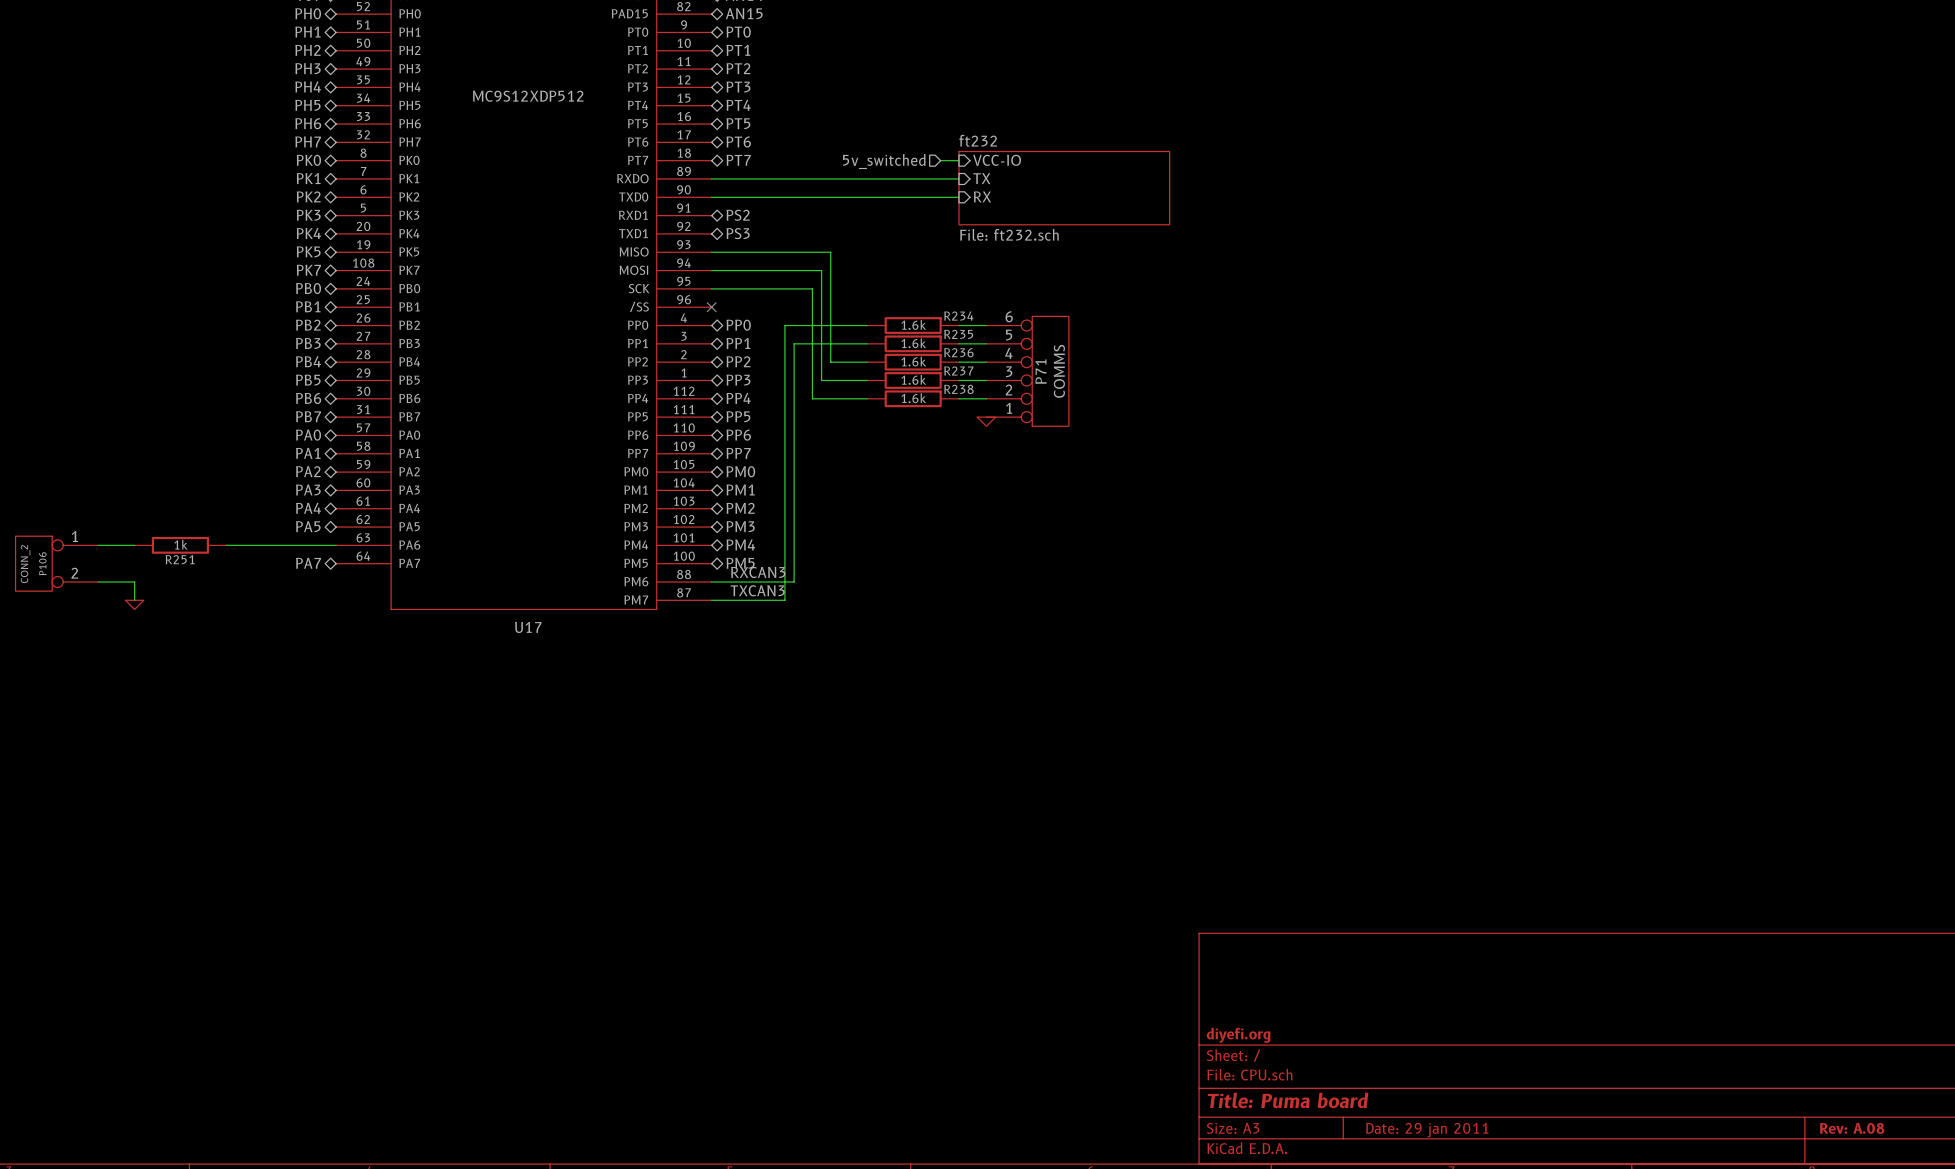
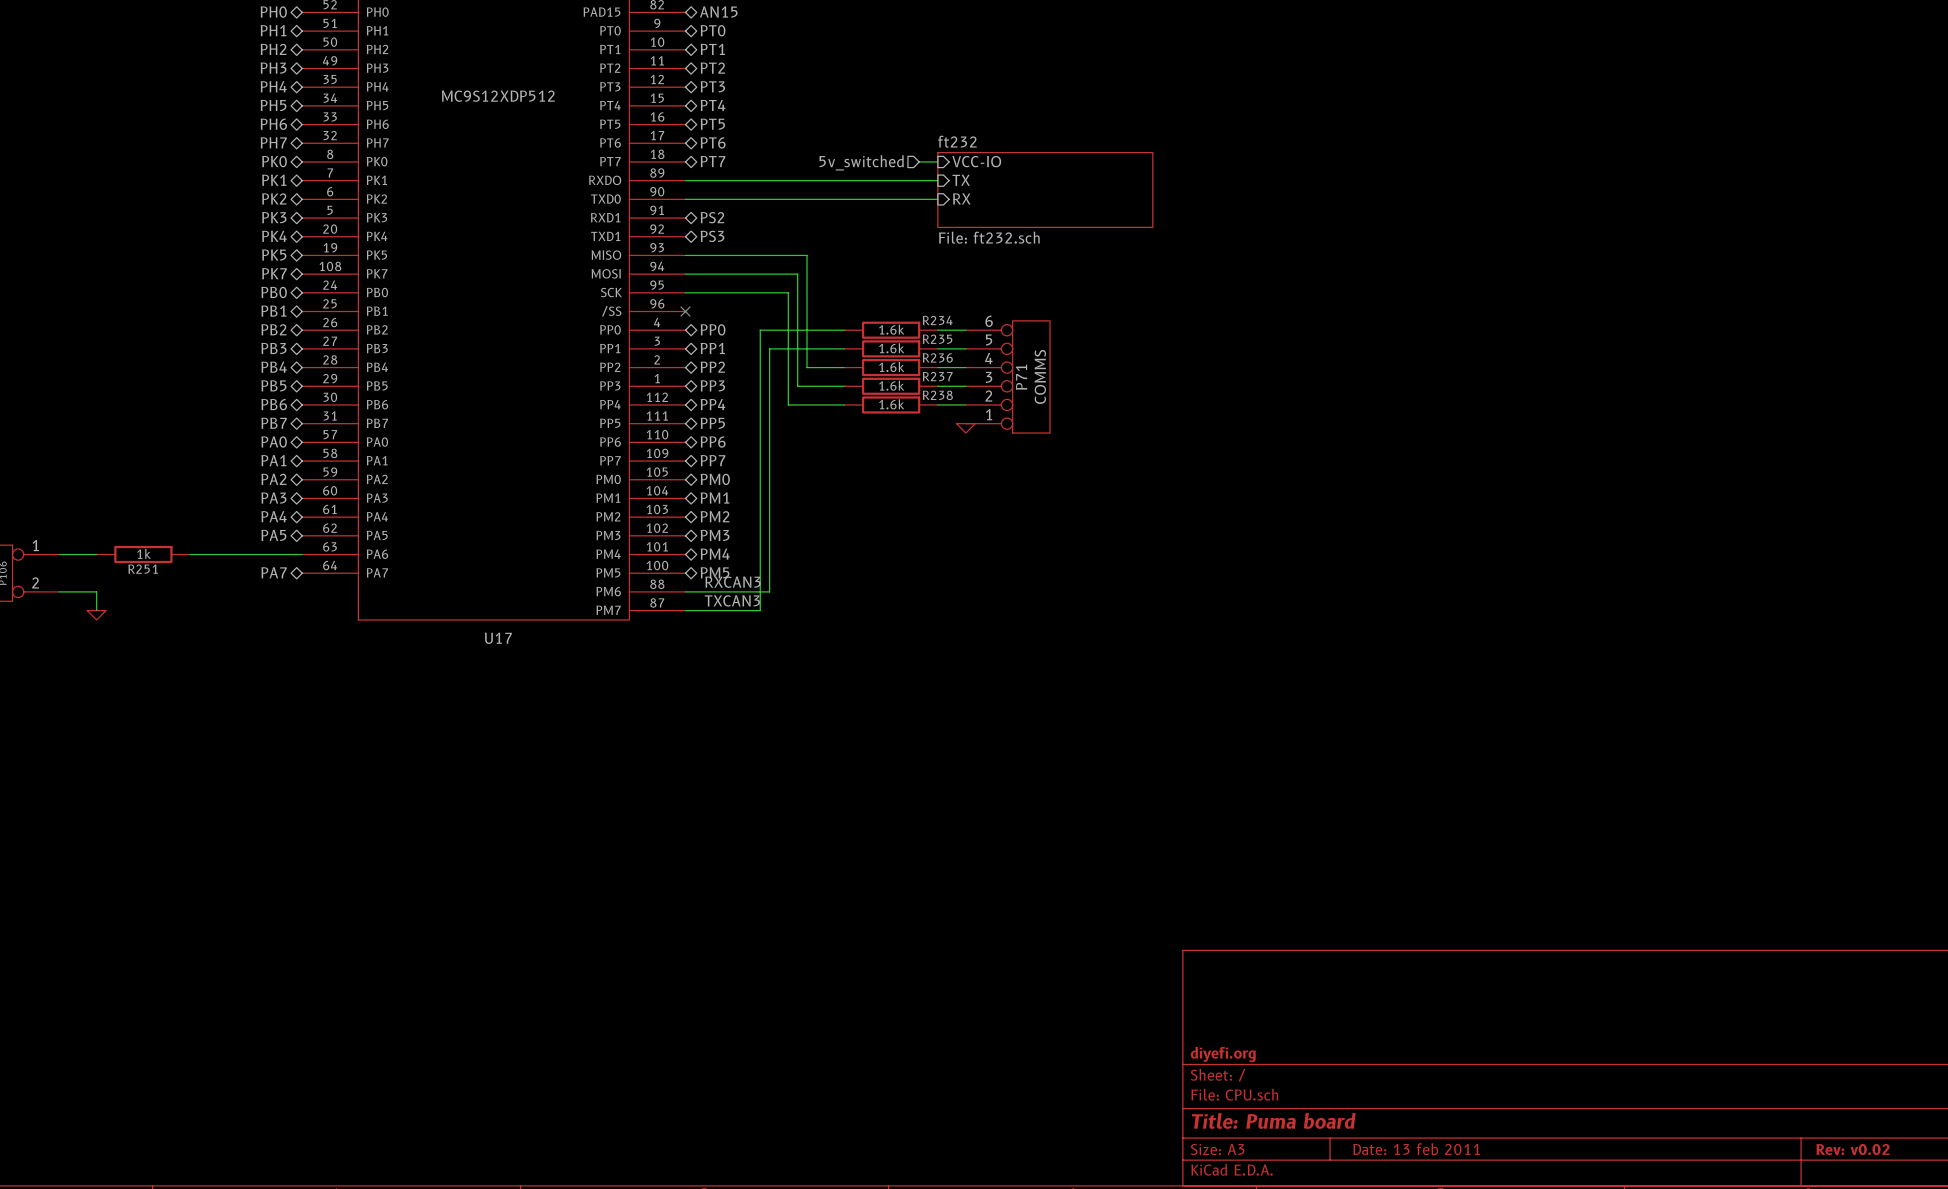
title block: Rev: A.08 (1852, 1128) -> Rev: v0.02 (1853, 1149)
title block: Date: 29 jan 2011 (1427, 1130) -> Date: 13 feb 2011 (1416, 1149)

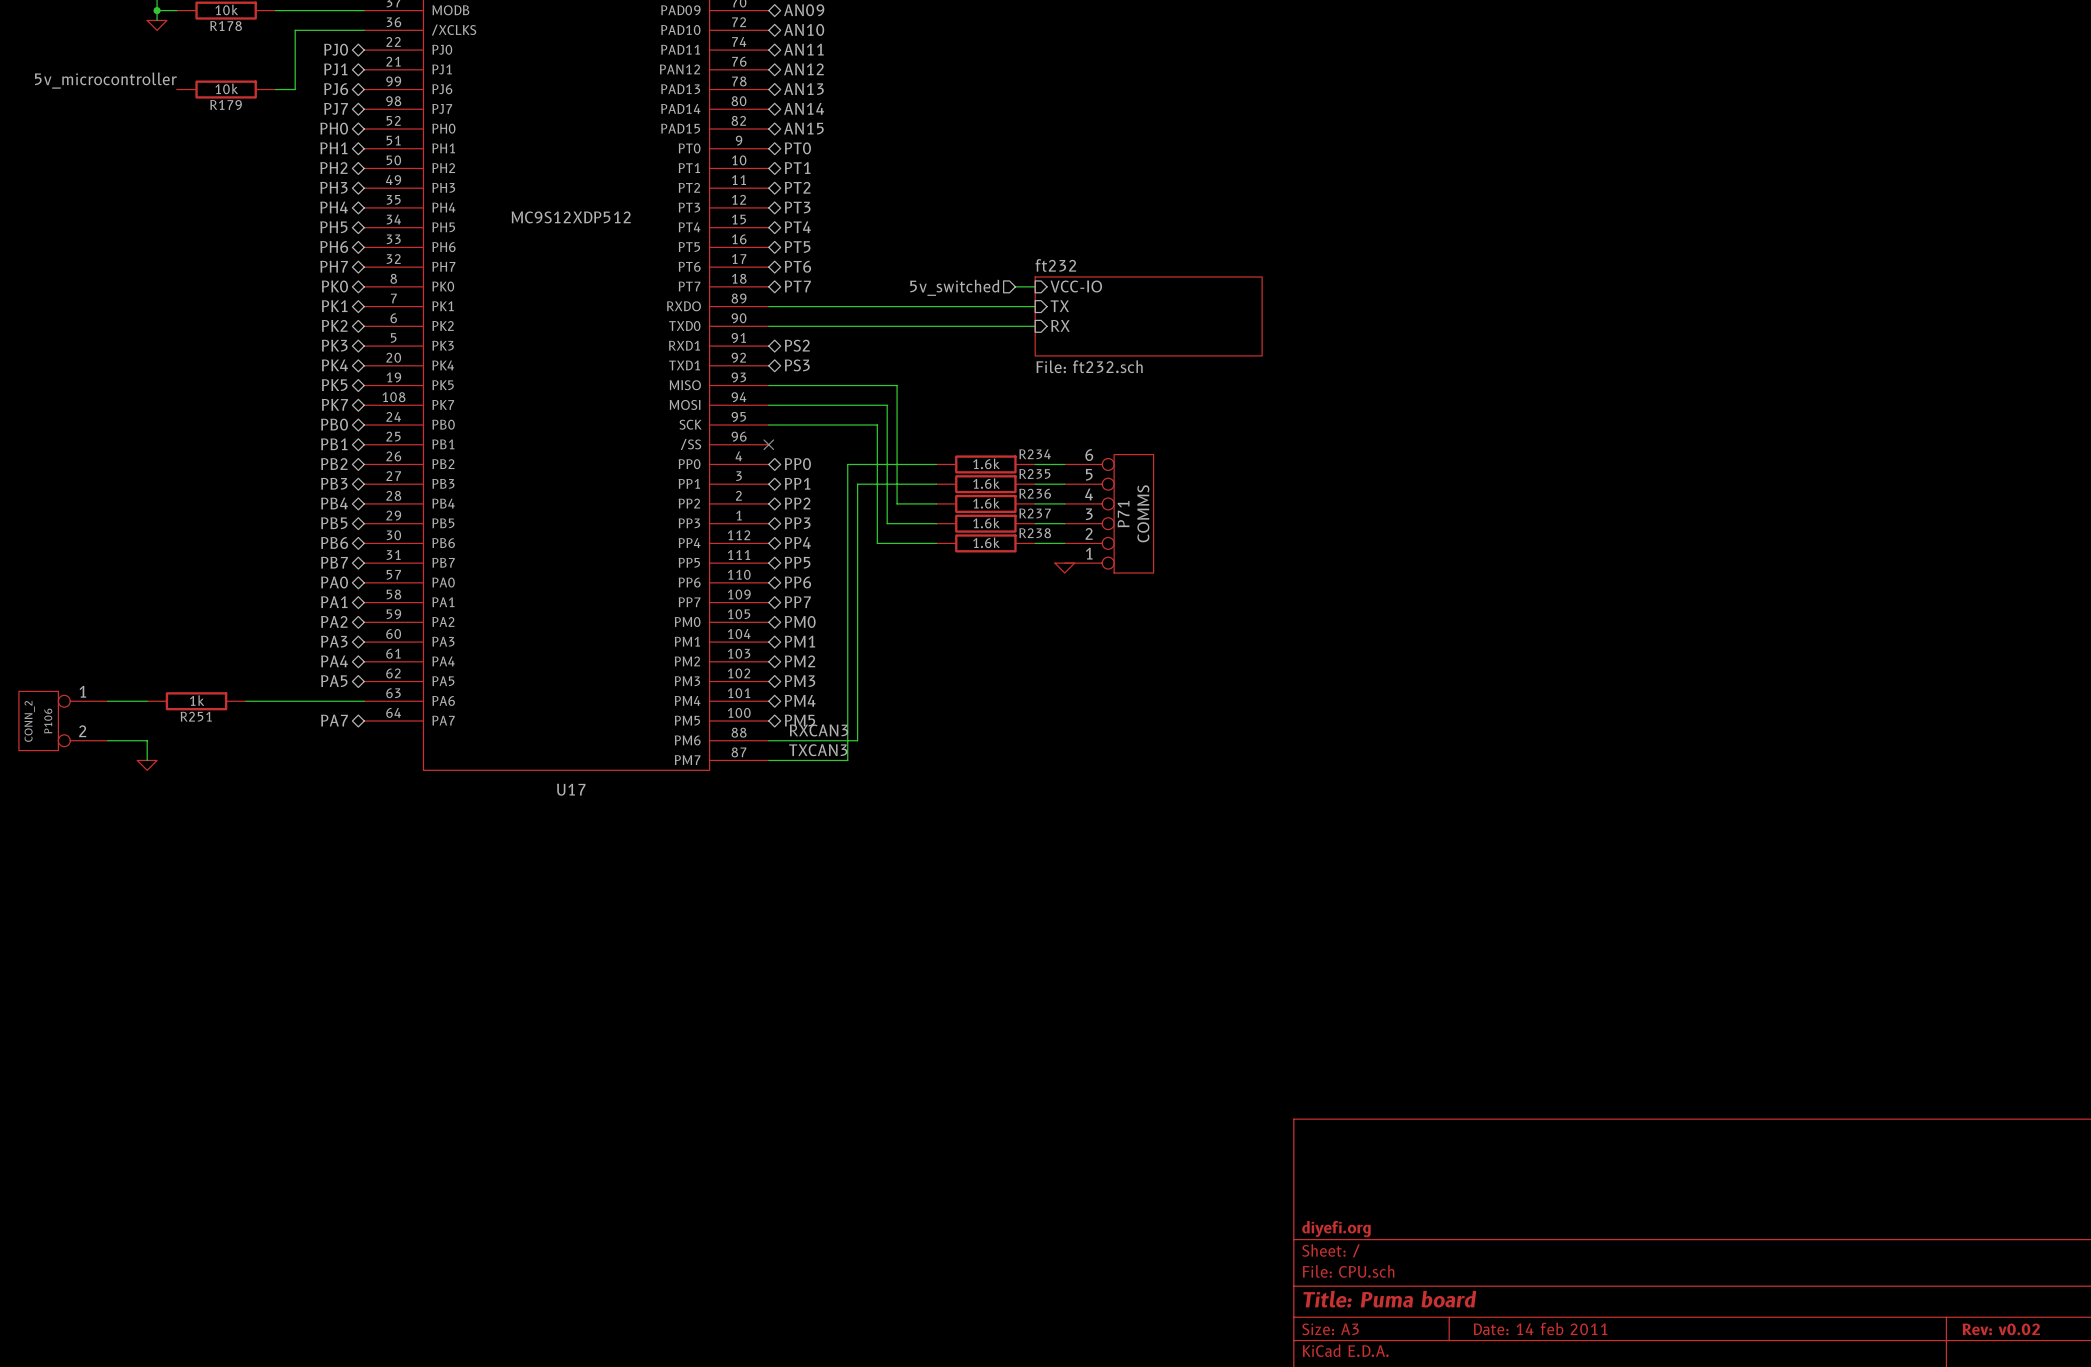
title block: Date: 13 feb 2011 (1416, 1149) -> Date: 14 feb 2011 (1540, 1328)

